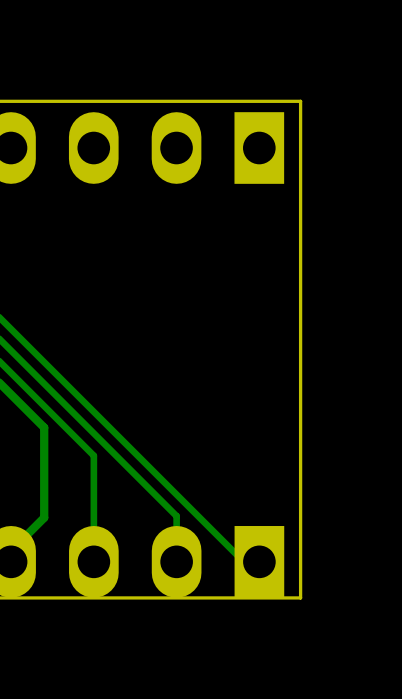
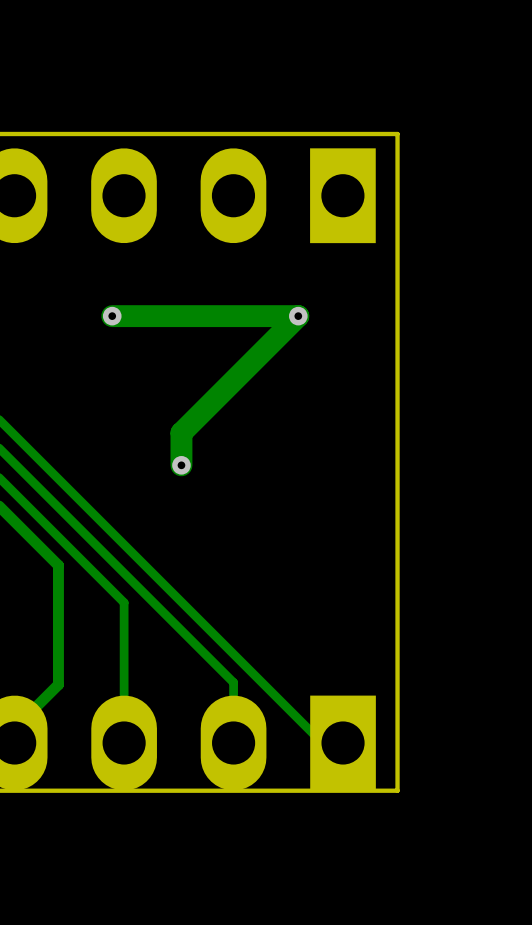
track: none -> (112, 316) (298, 316) (181, 432) (181, 465)
via: none -> (112, 316)
via: none -> (298, 316)
via: none -> (181, 465)

